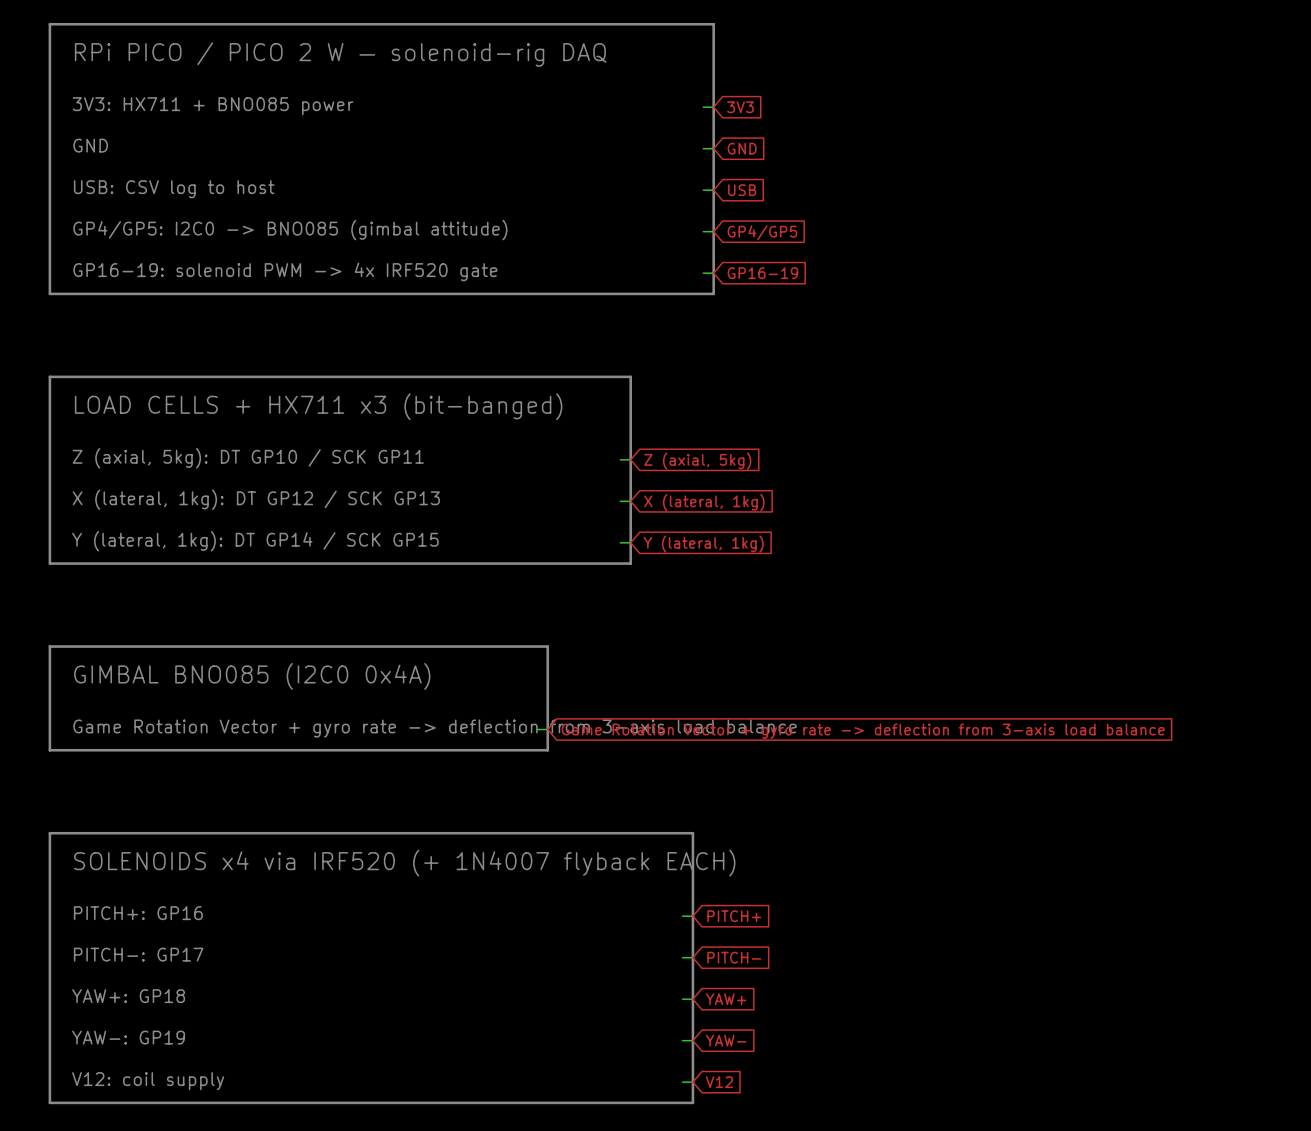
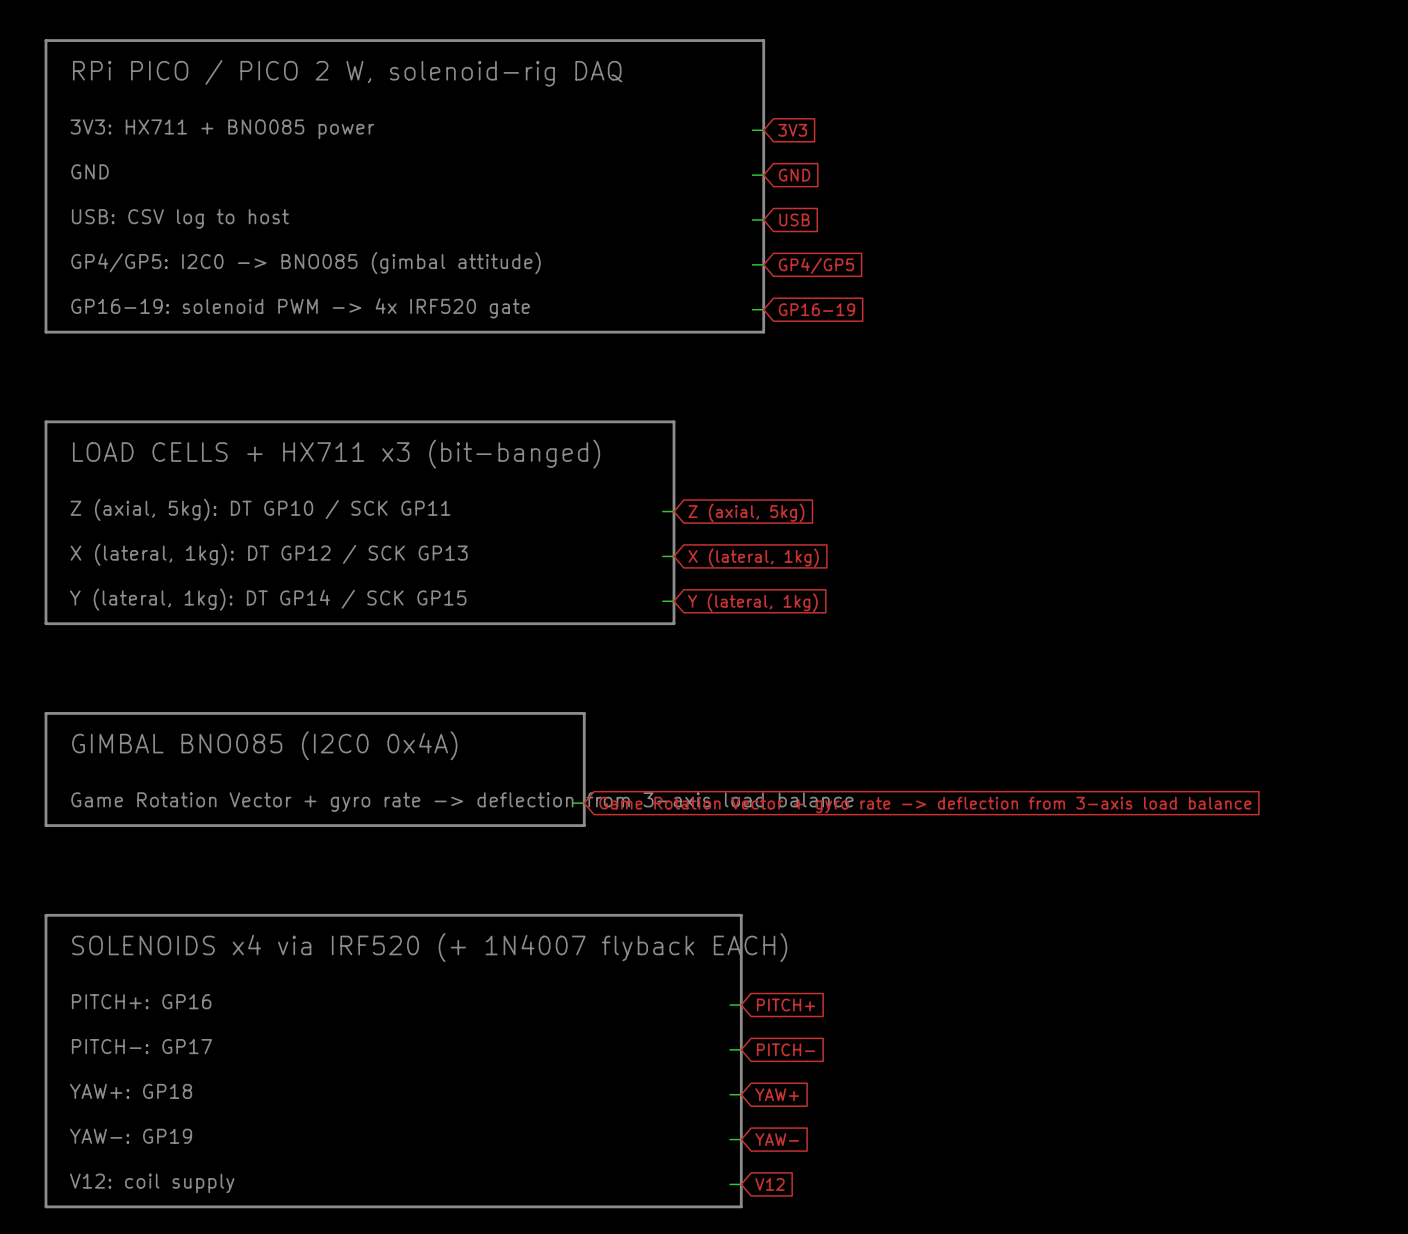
text: RPi PICO / PICO 2 W — solenoid-rig DAQ (340, 54) -> RPi PICO / PICO 2 W, solenoid-rig DAQ (347, 73)

